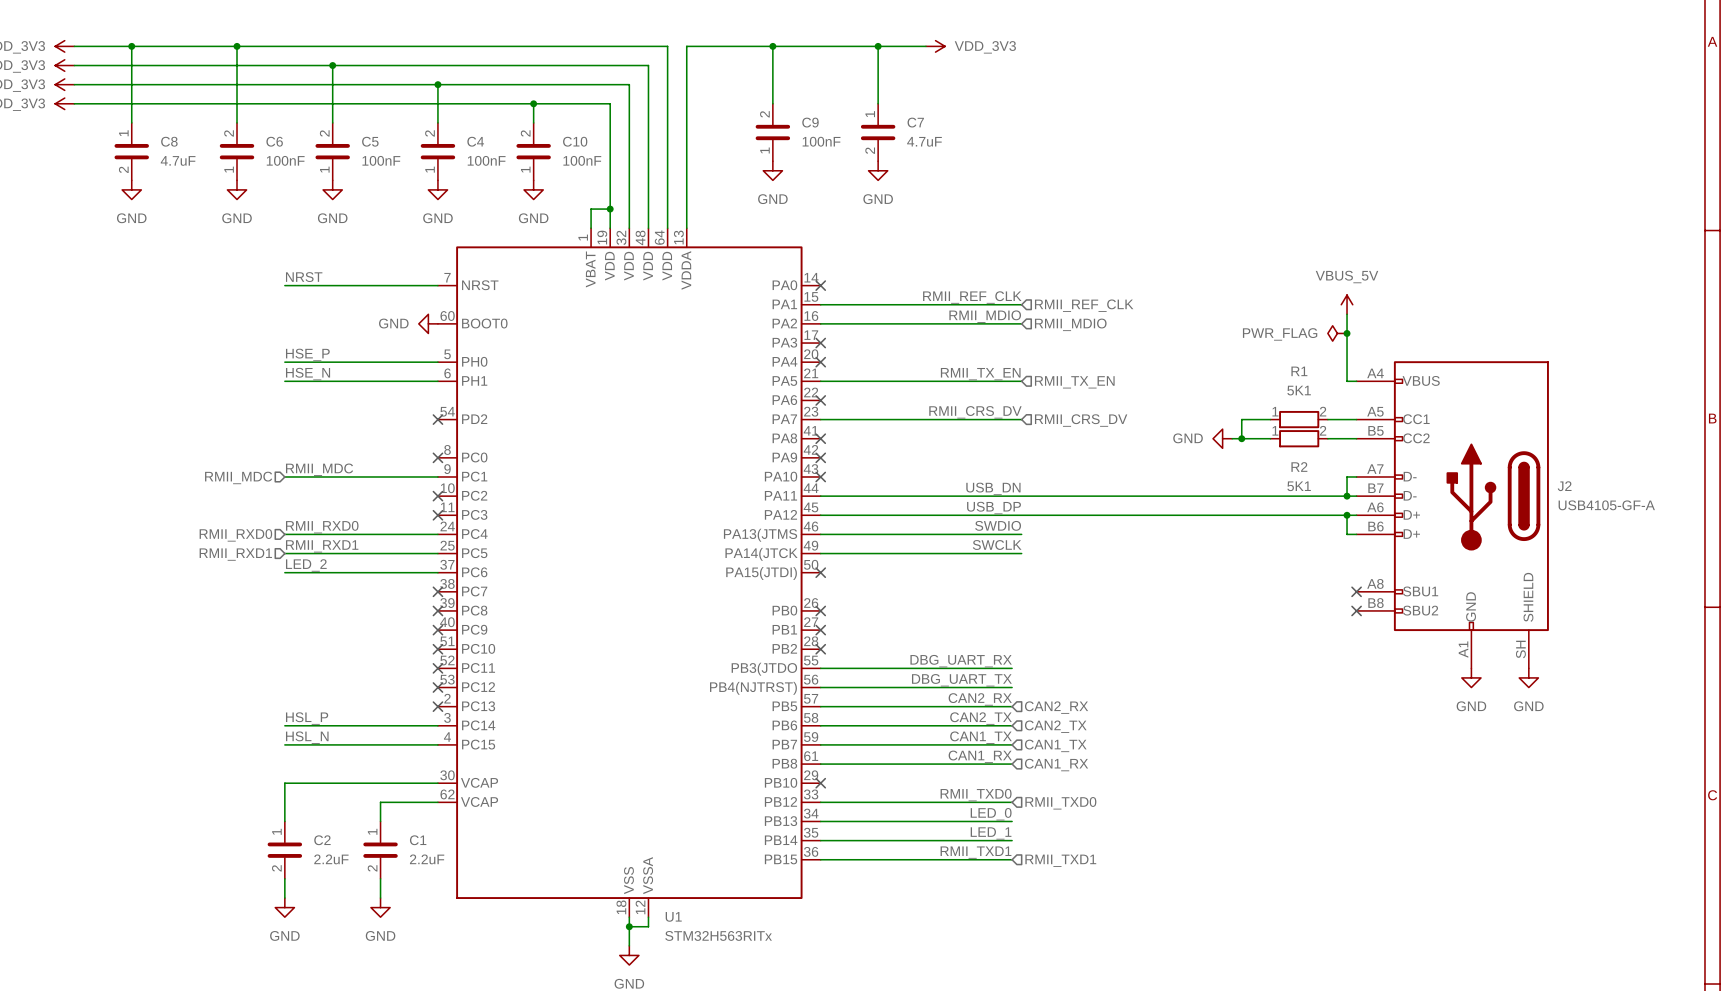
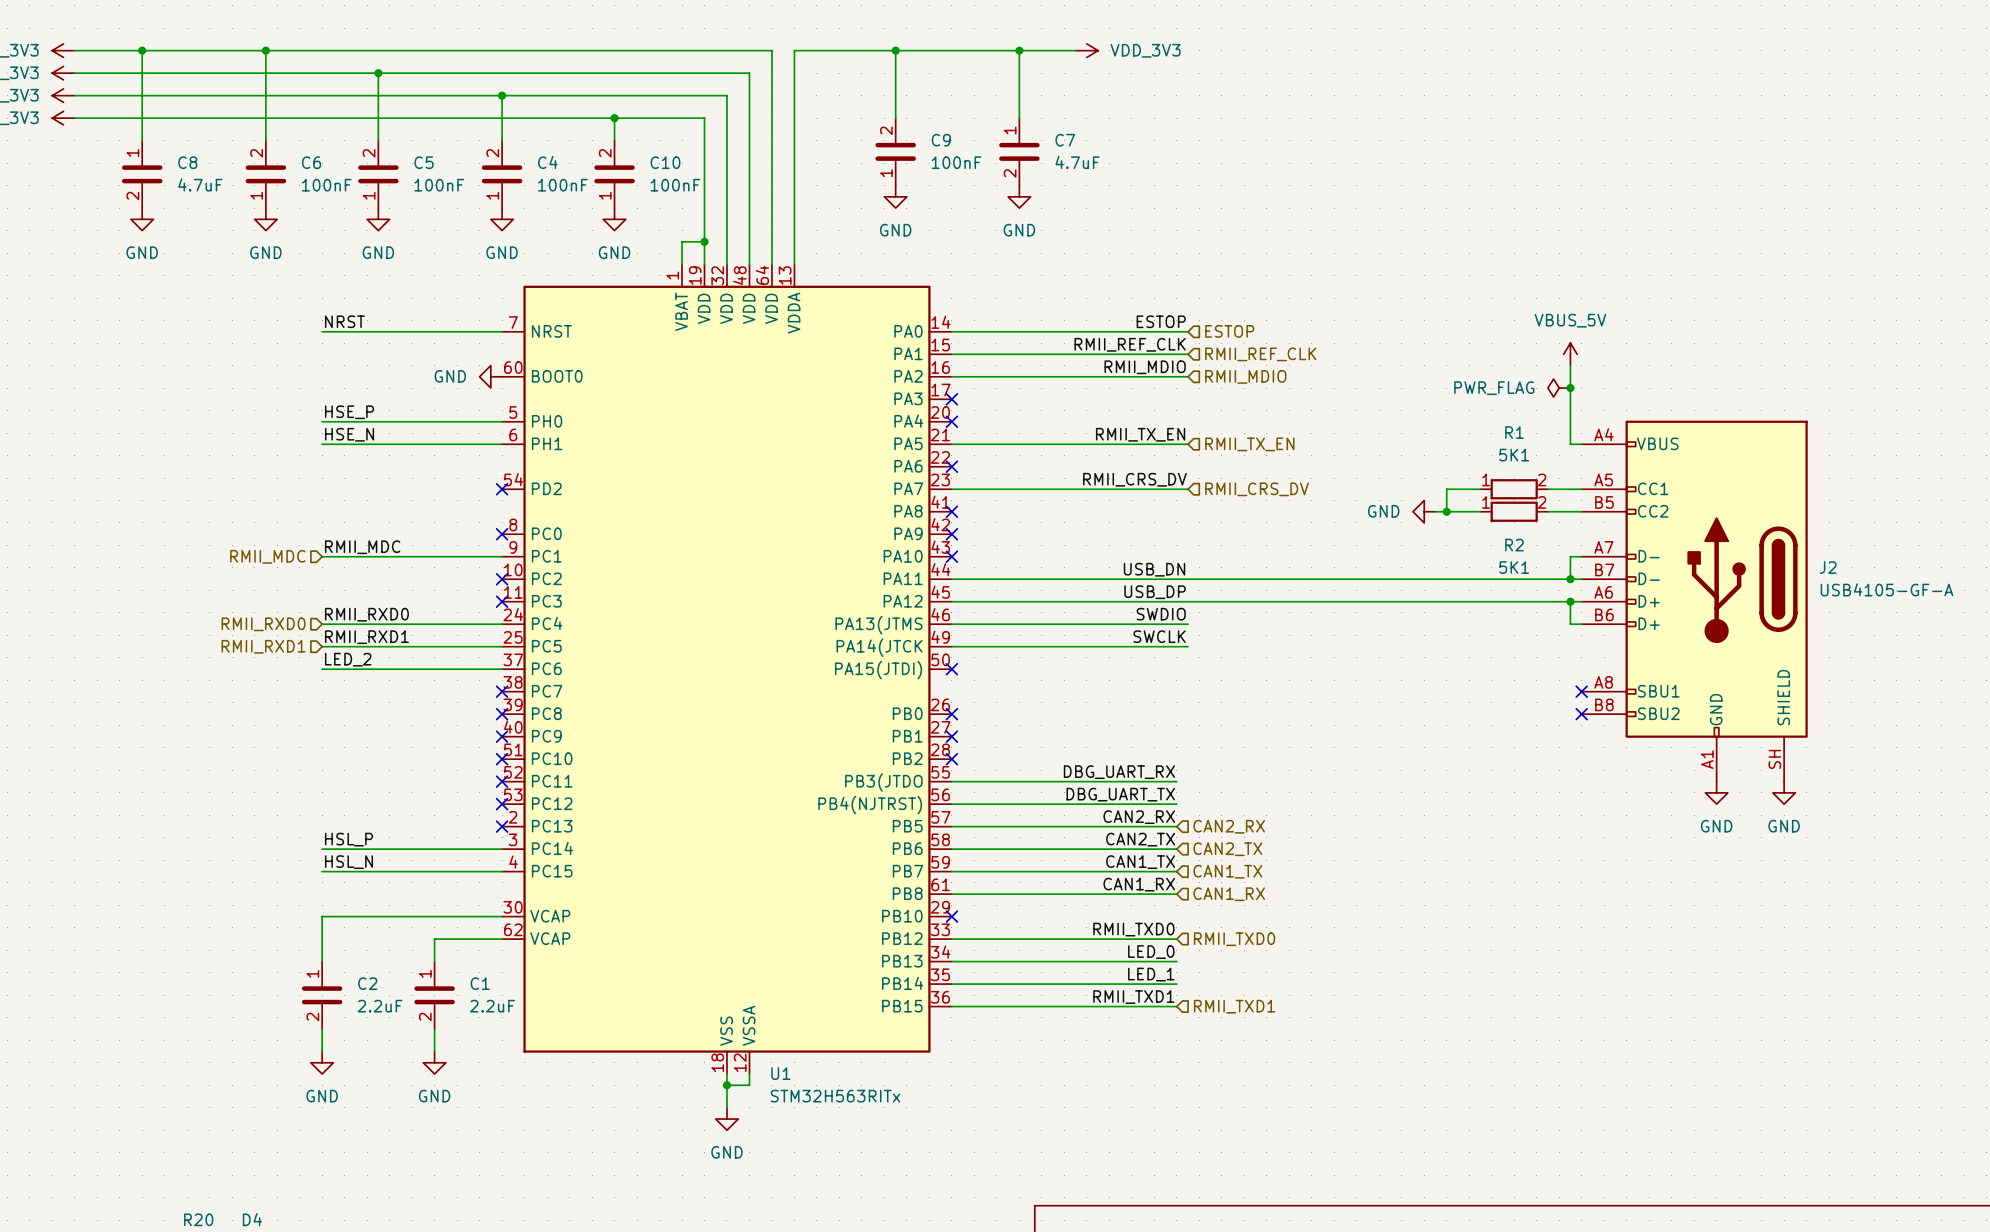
label: none -> ESTOP (1161, 321)
wire: none -> (951, 331) (1188, 331)
no-connect mark: (820, 285) -> none
hierarchical label: none -> ESTOP (1229, 331)

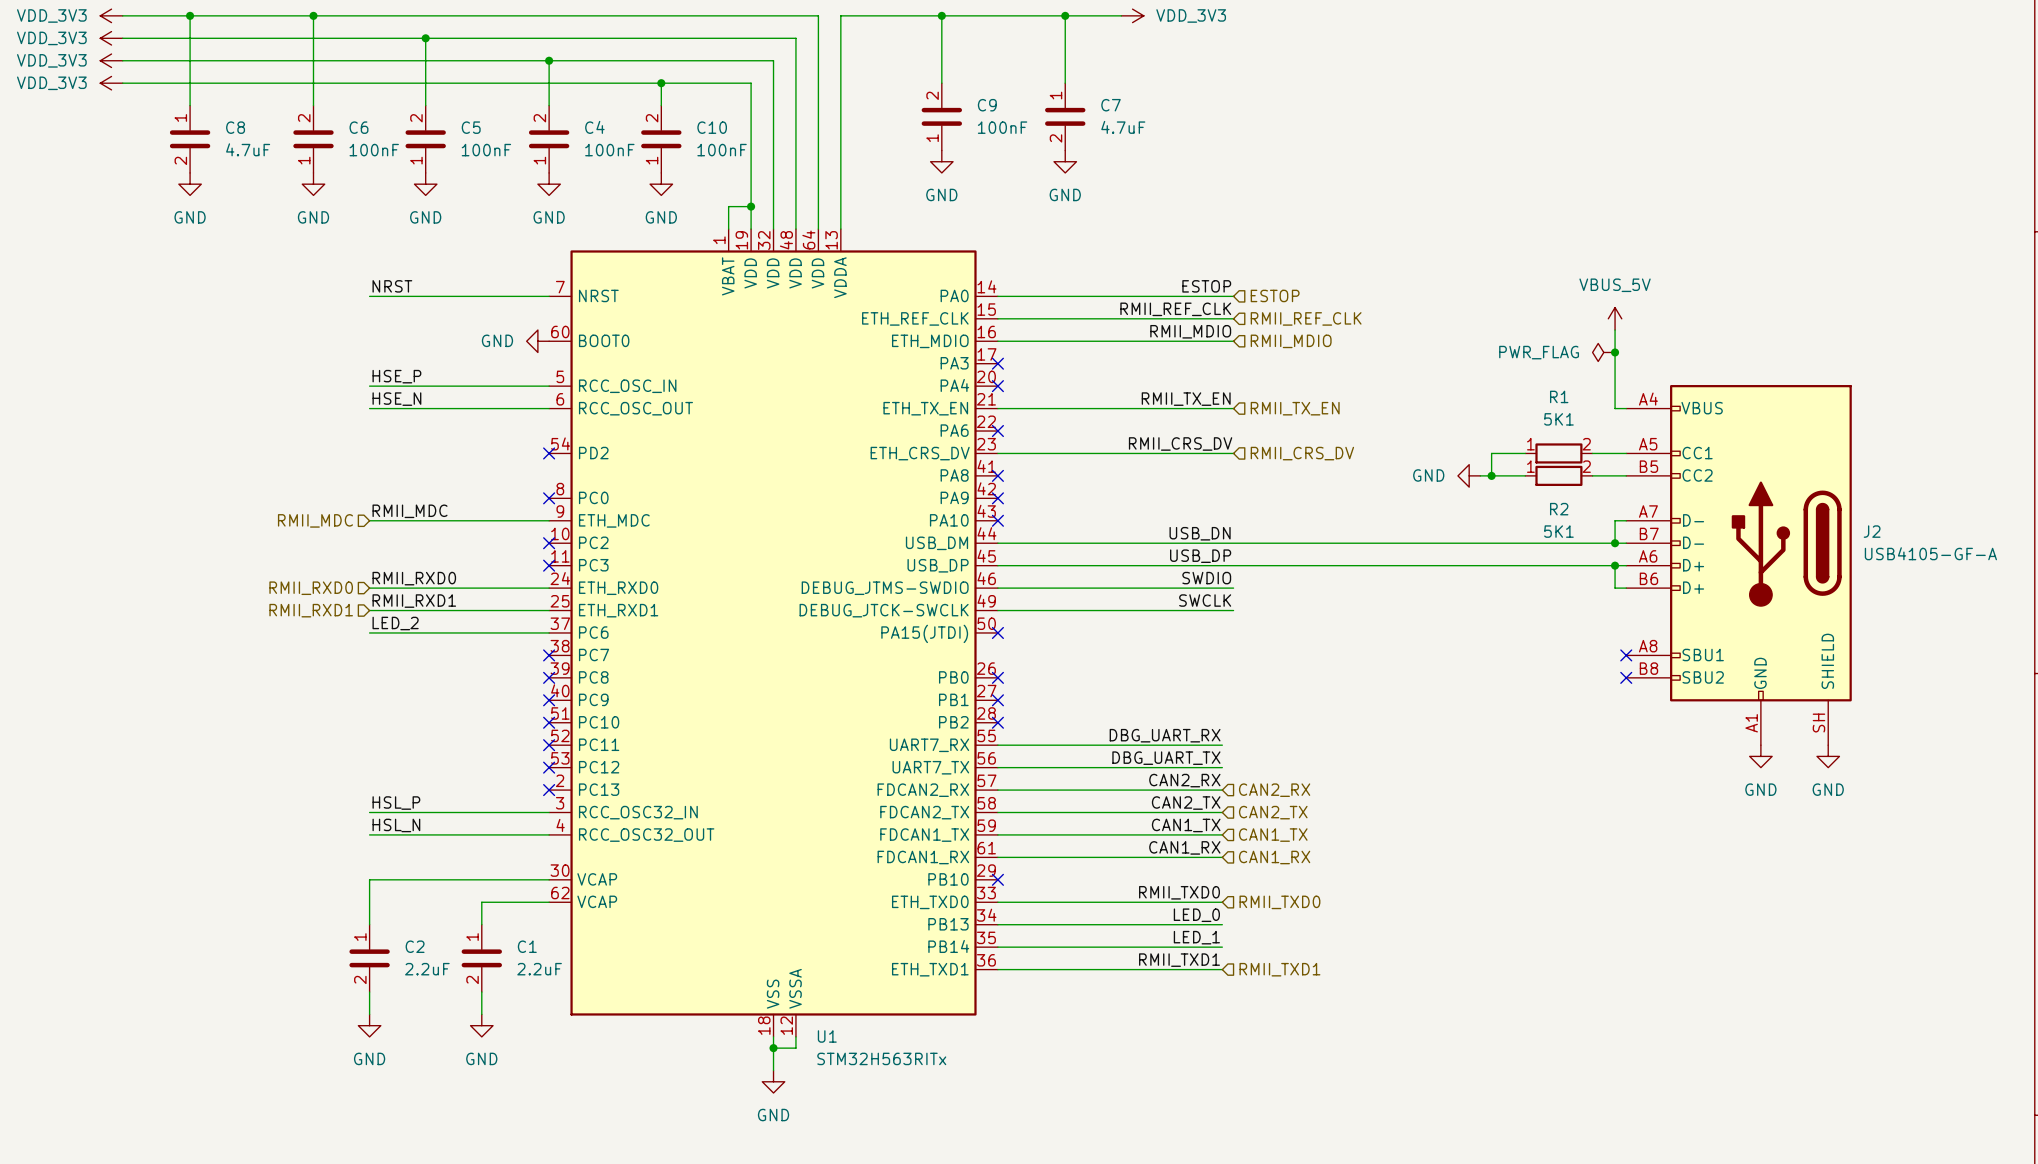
U1 symbol: [502, 264, 952, 1075] -> [549, 229, 998, 1037]

